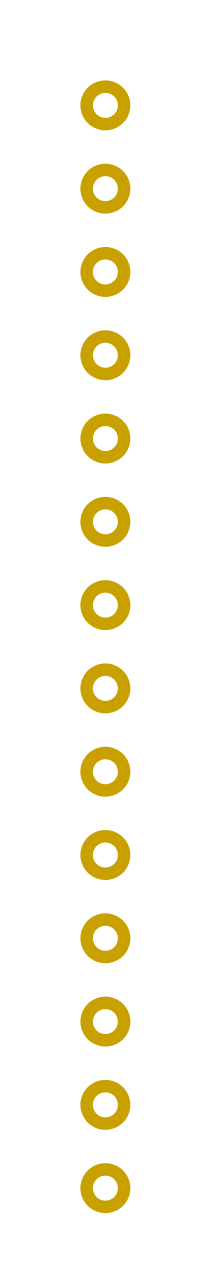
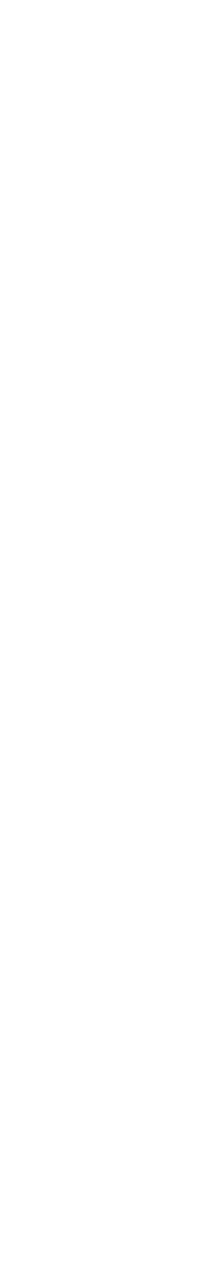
part: (105, 646) -> none

